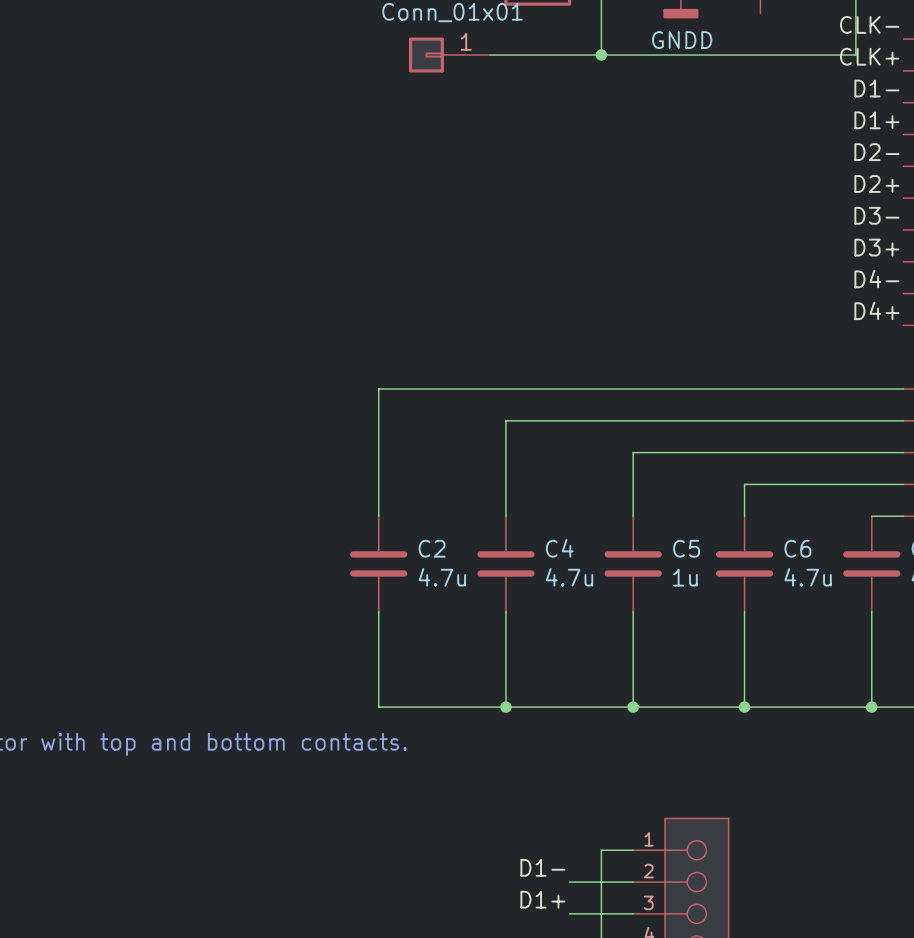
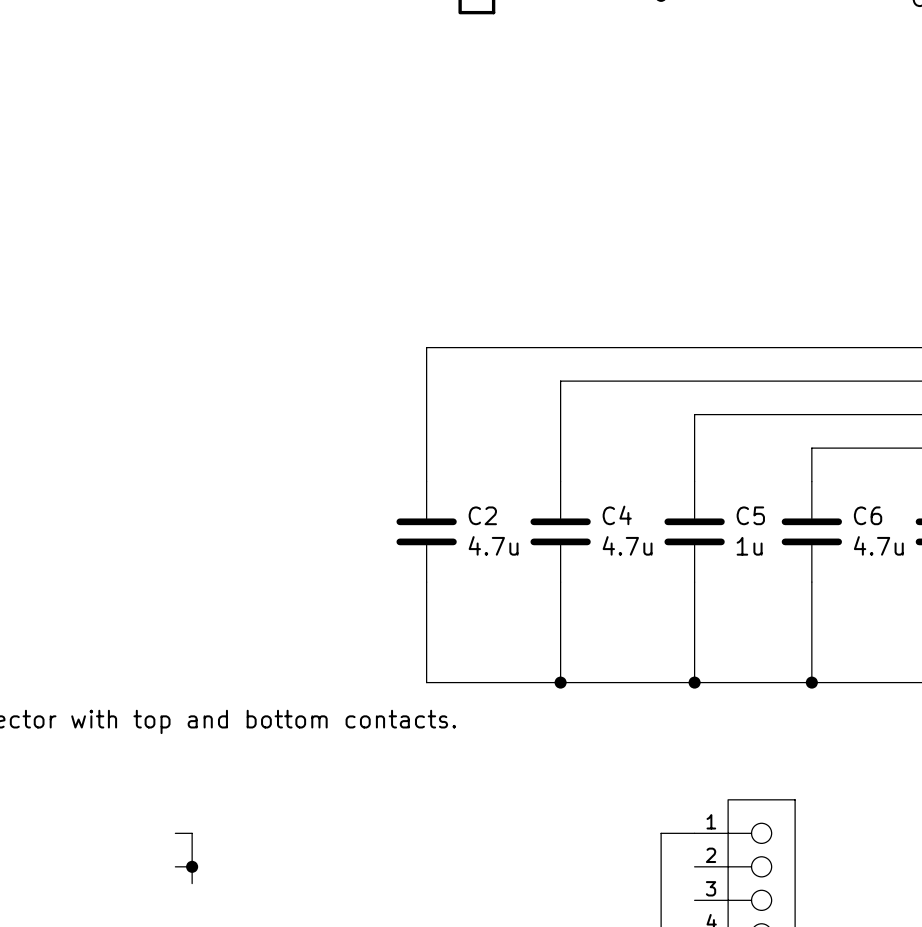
wire: none -> (175, 833) (192, 833) (192, 883)
label: D1- (542, 867) -> none
wire: none -> (175, 866) (192, 866)
junction: none -> (192, 866)
wire: (569, 882) (633, 882) -> none
label: D1+ (542, 899) -> none
wire: (569, 913) (633, 913) -> none

